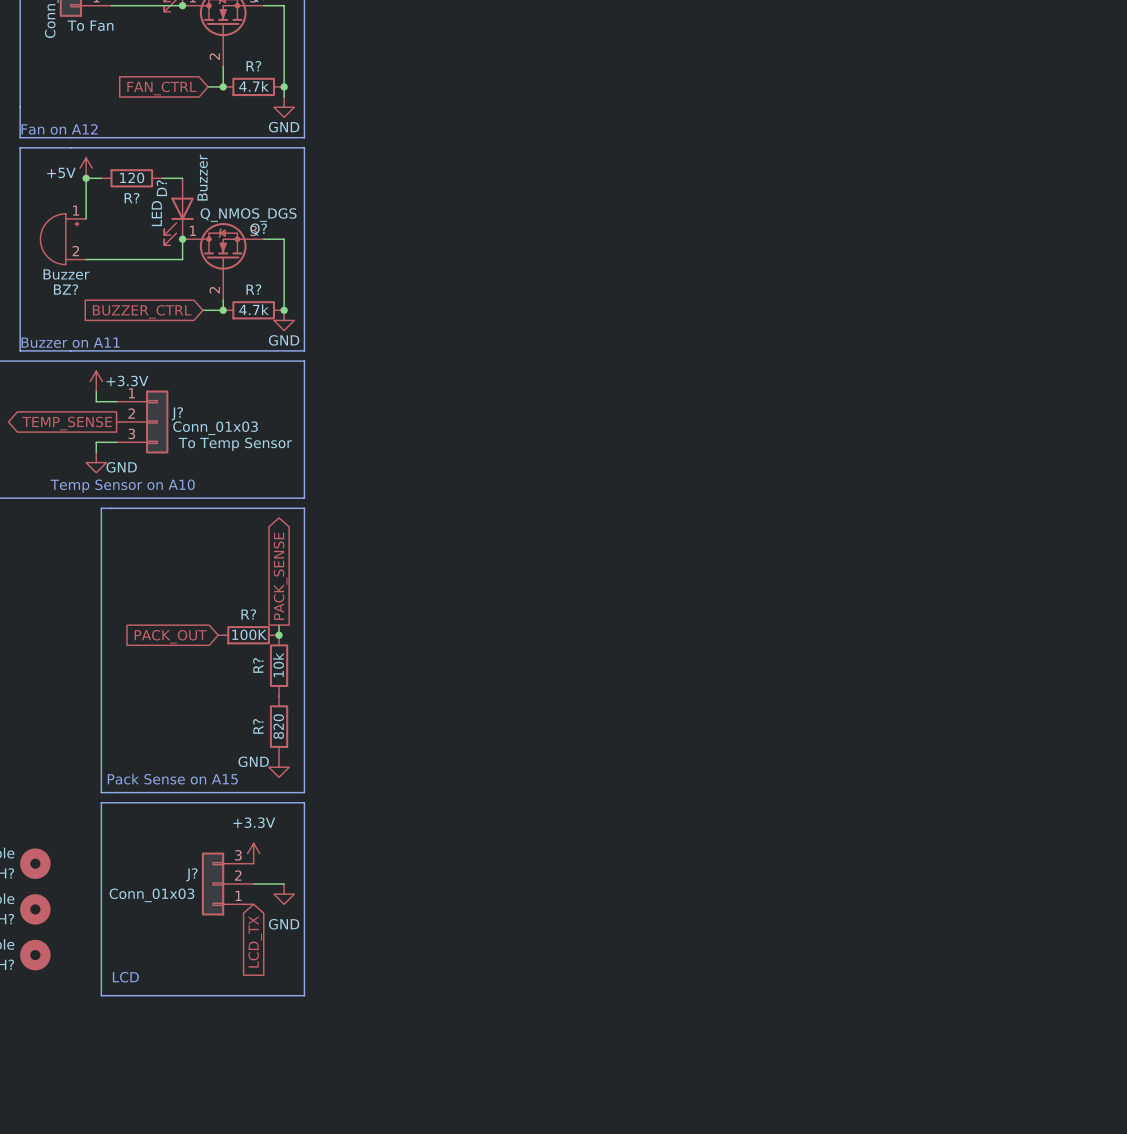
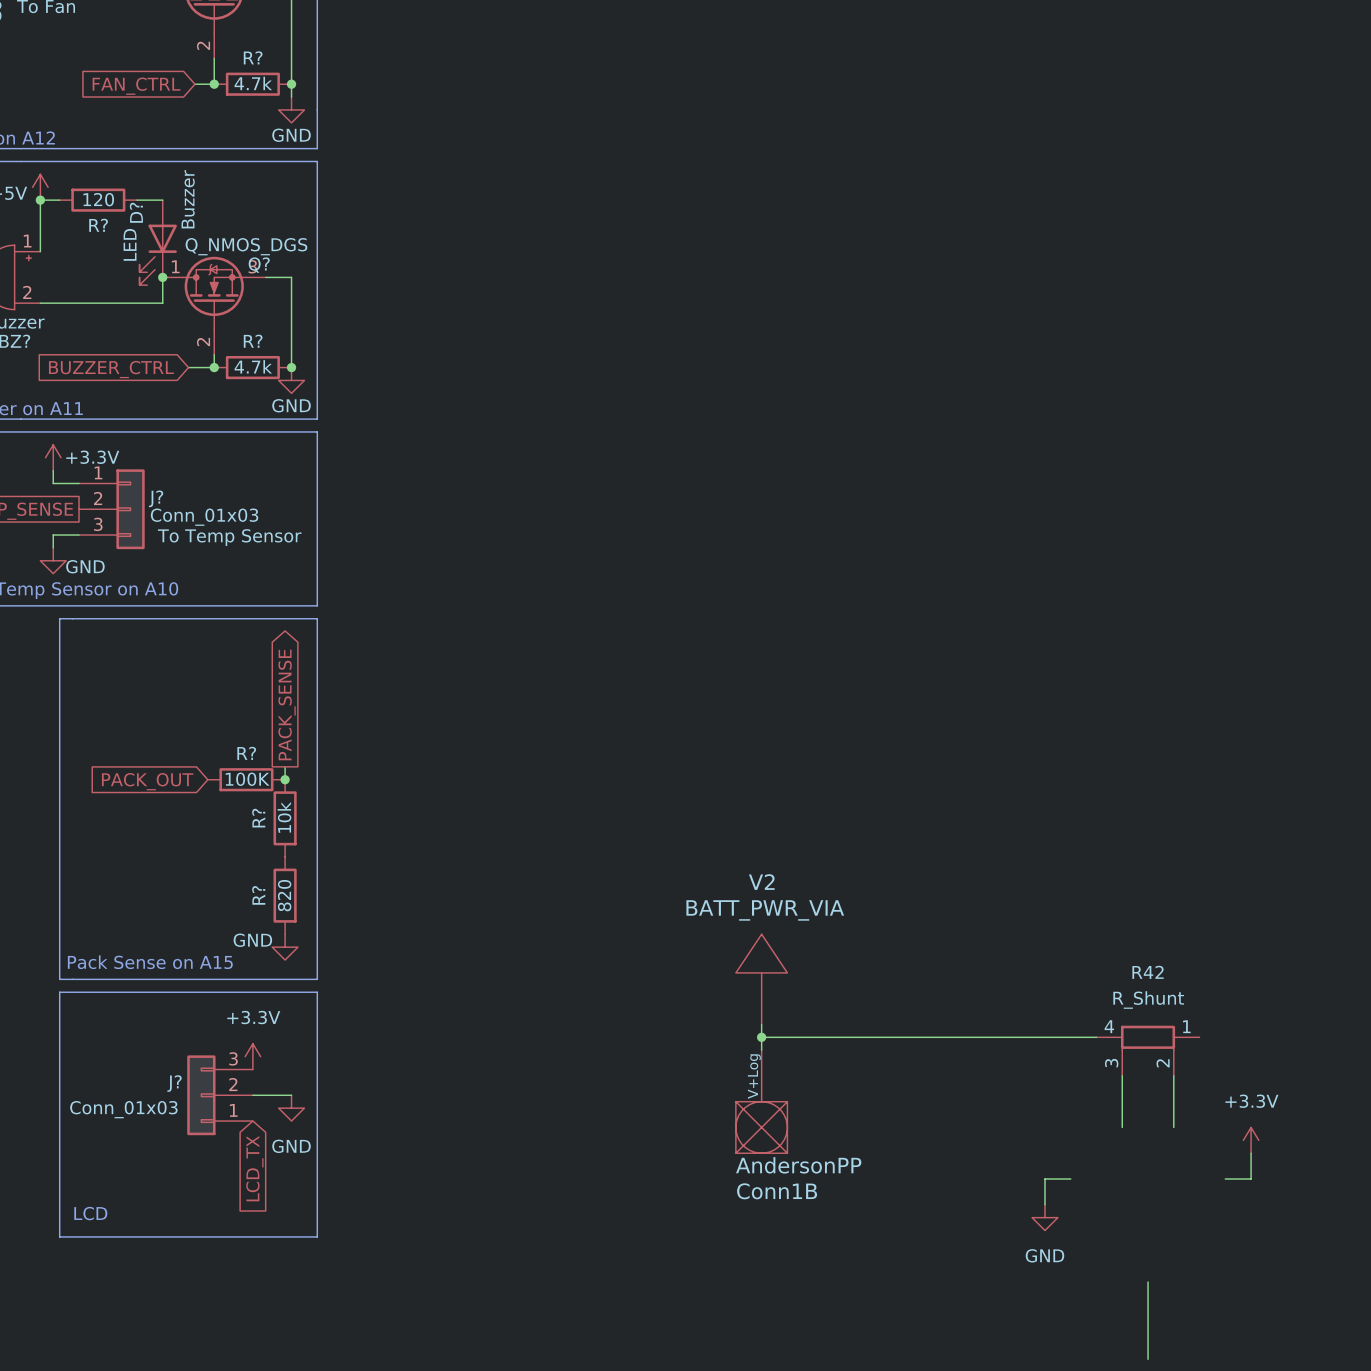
V2: none -> BATT_PWR_VIA (761, 979)
wire: none -> (761, 1024) (761, 1050)
wire: none -> (761, 1037) (1096, 1037)
junction: none -> (761, 1037)
R42: none -> R_Shunt (1148, 1050)
wire: none -> (1122, 1075) (1122, 1127)
wire: none -> (1173, 1075) (1173, 1127)
Conn1B: none -> AndersonPP (761, 1101)
power symbol: none -> +3.3V (1251, 1140)
wire: none -> (1251, 1153) (1251, 1179) (1225, 1179)
wire: none -> (1070, 1179) (1045, 1179) (1045, 1204)
power symbol: none -> GND (1045, 1217)
wire: none -> (1148, 1282) (1148, 1359)

